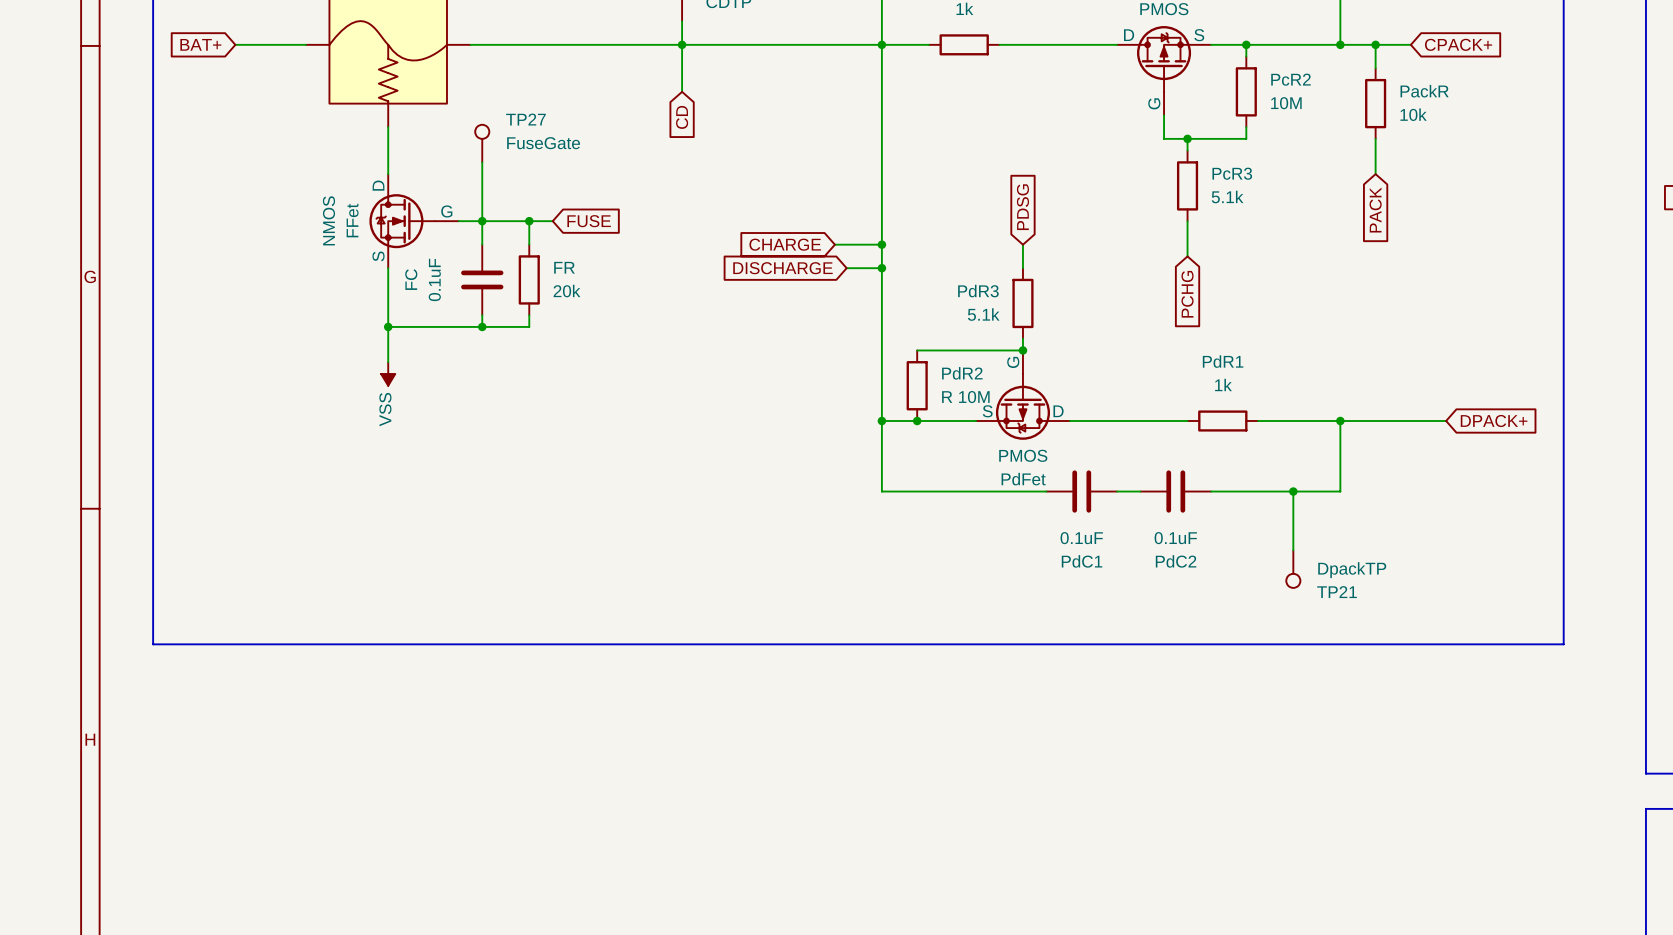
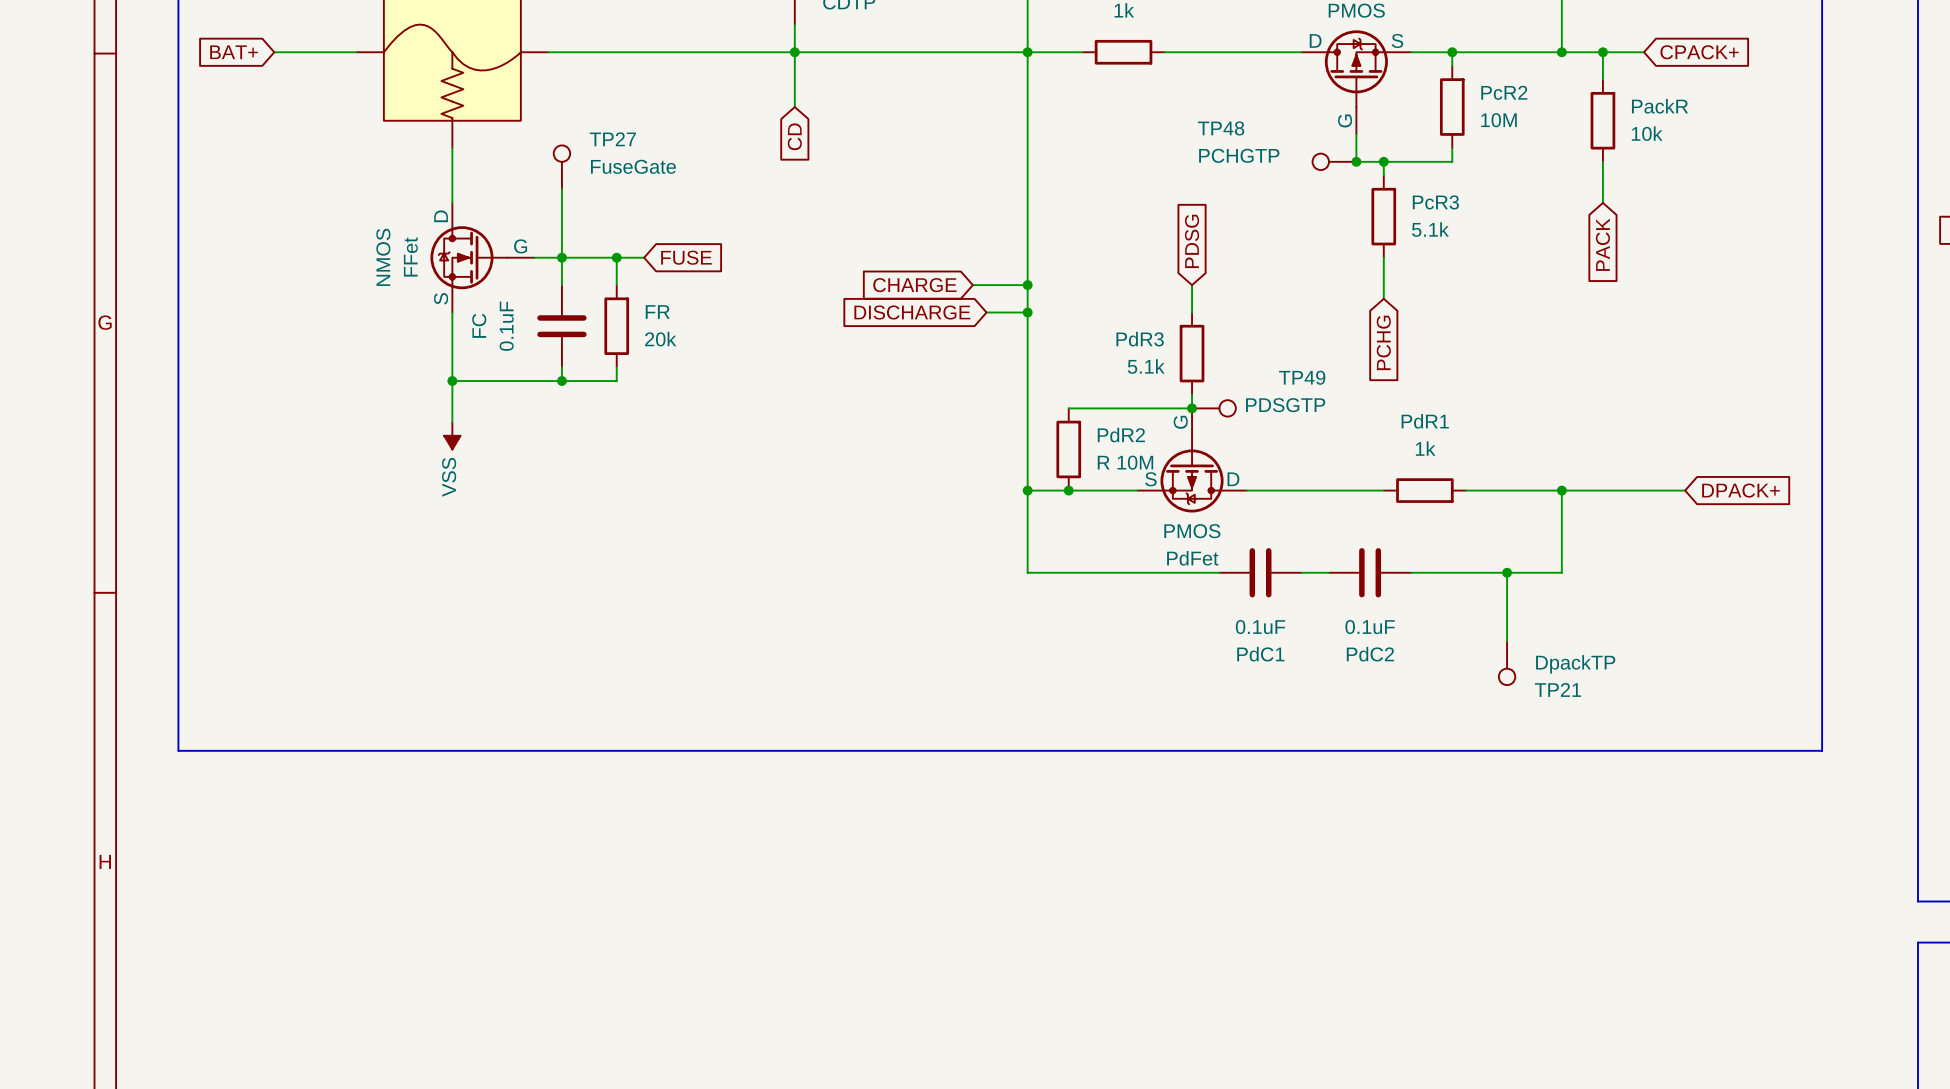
TP48: none -> PCHGTP (1334, 161)
junction: none -> (1356, 161)
TP49: none -> PDSGTP (1213, 408)

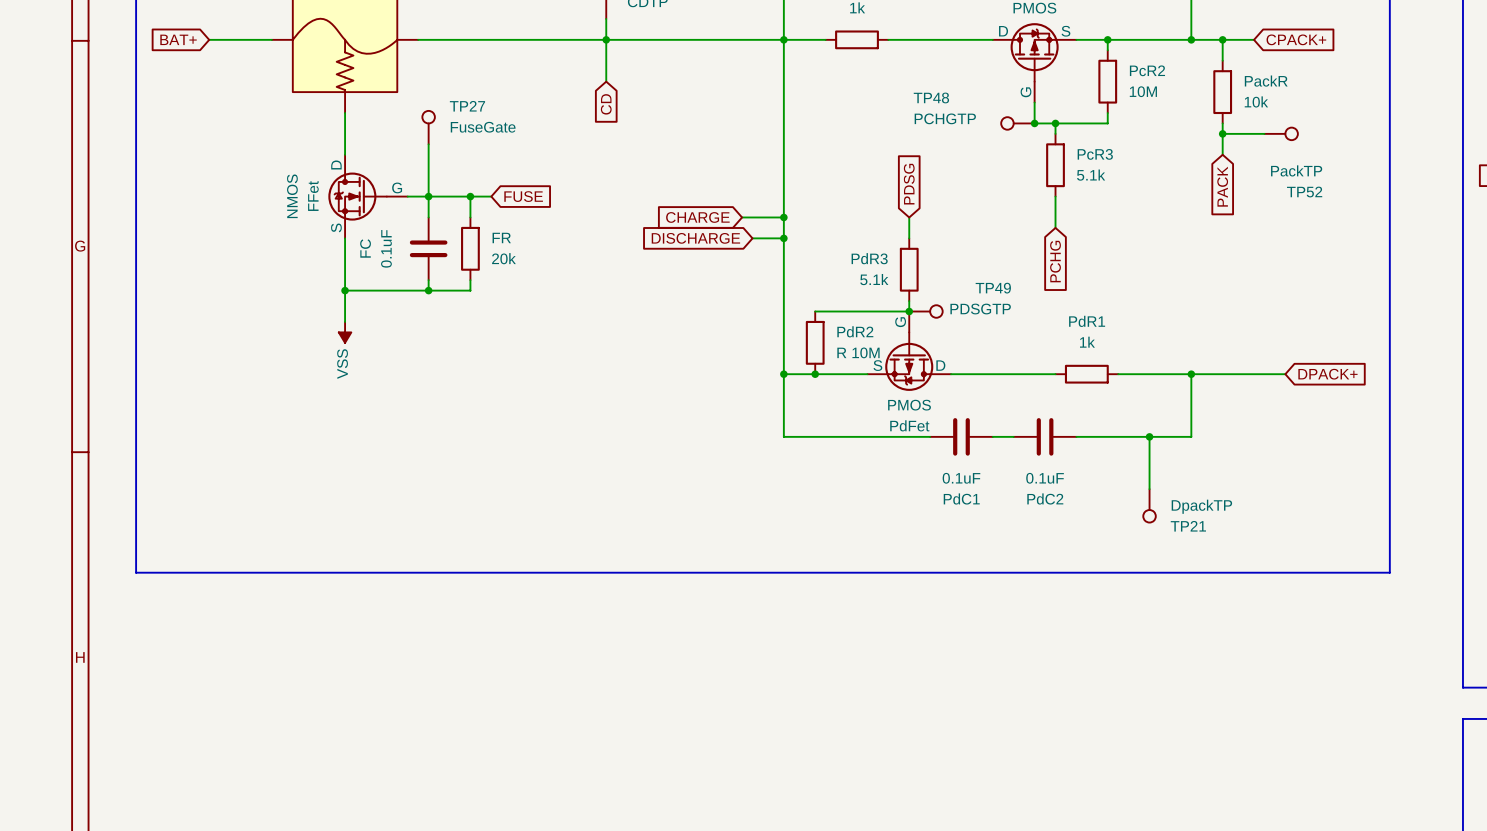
wire: none -> (1222, 133) (1264, 133)
junction: none -> (1222, 133)
TP52: none -> PackTP (1281, 133)

